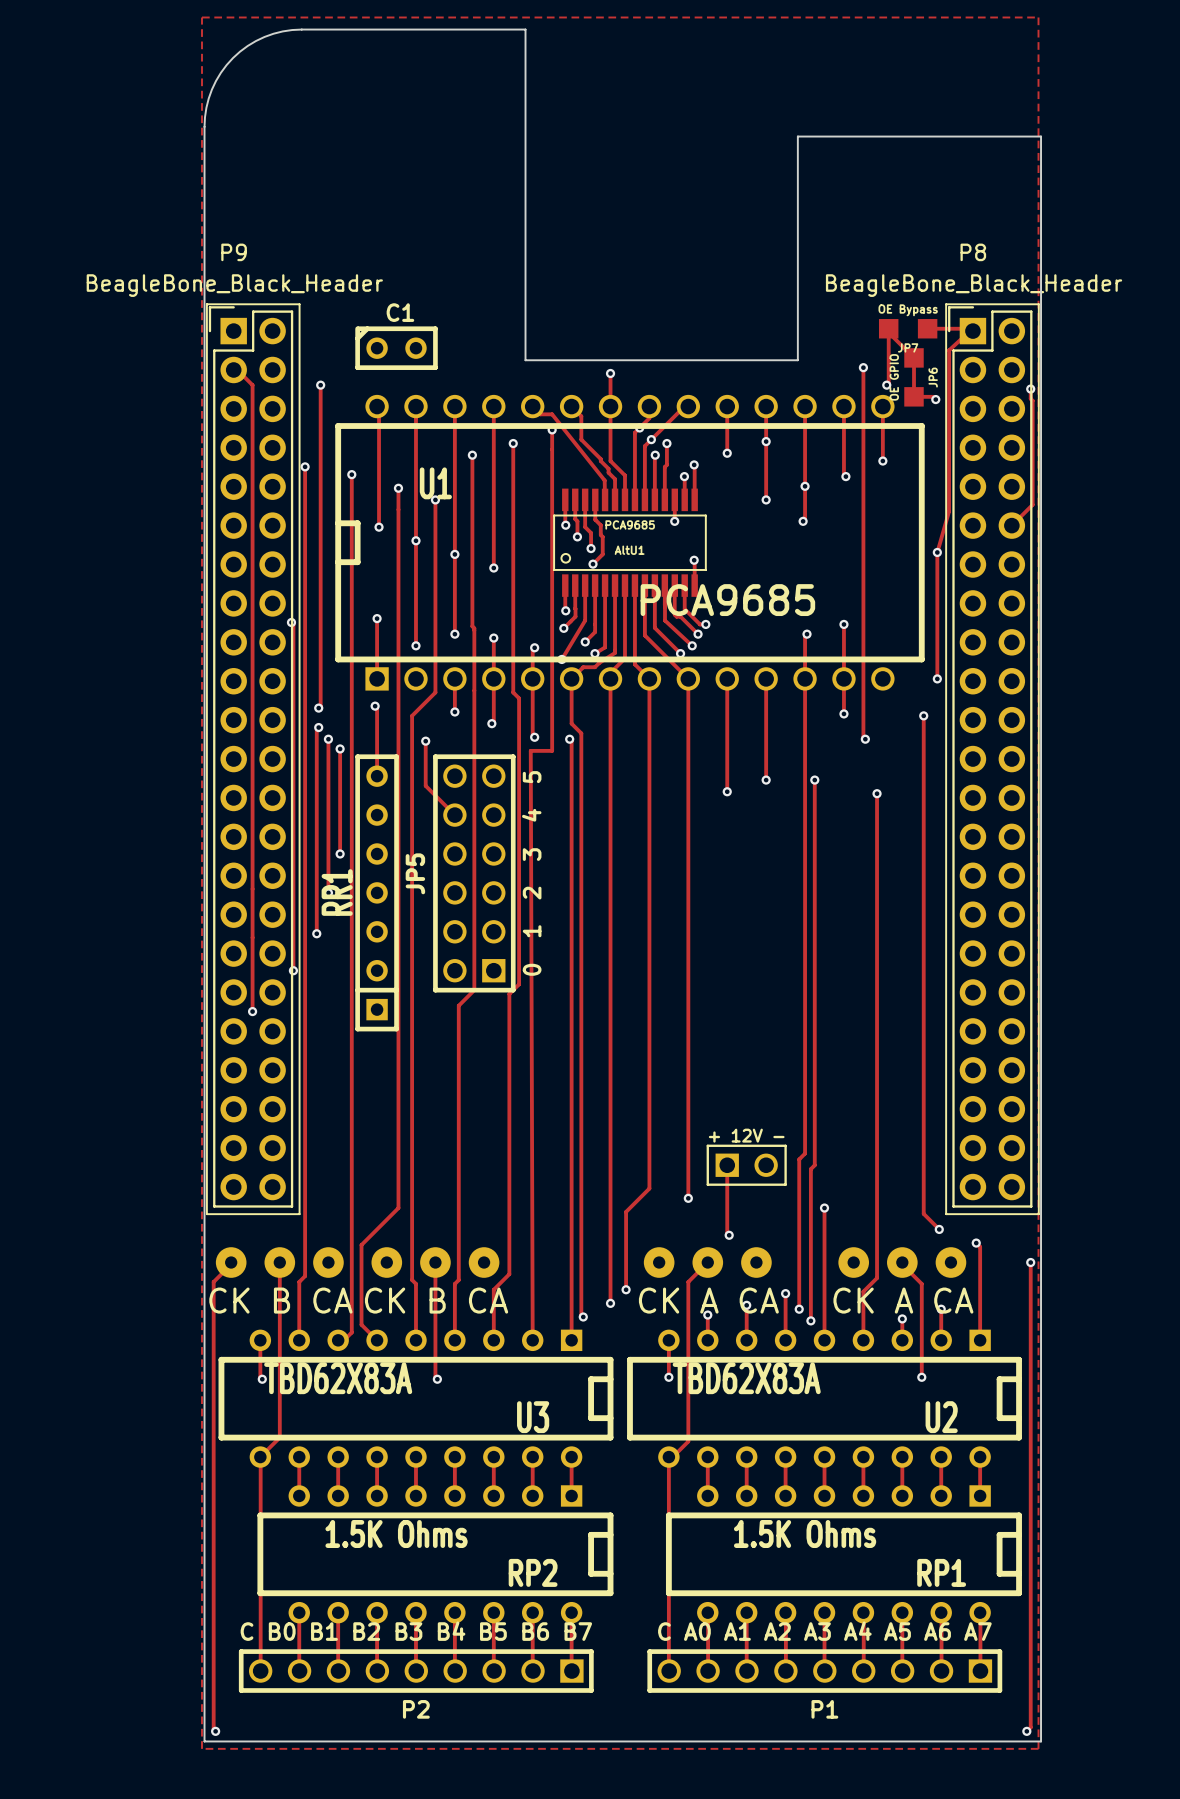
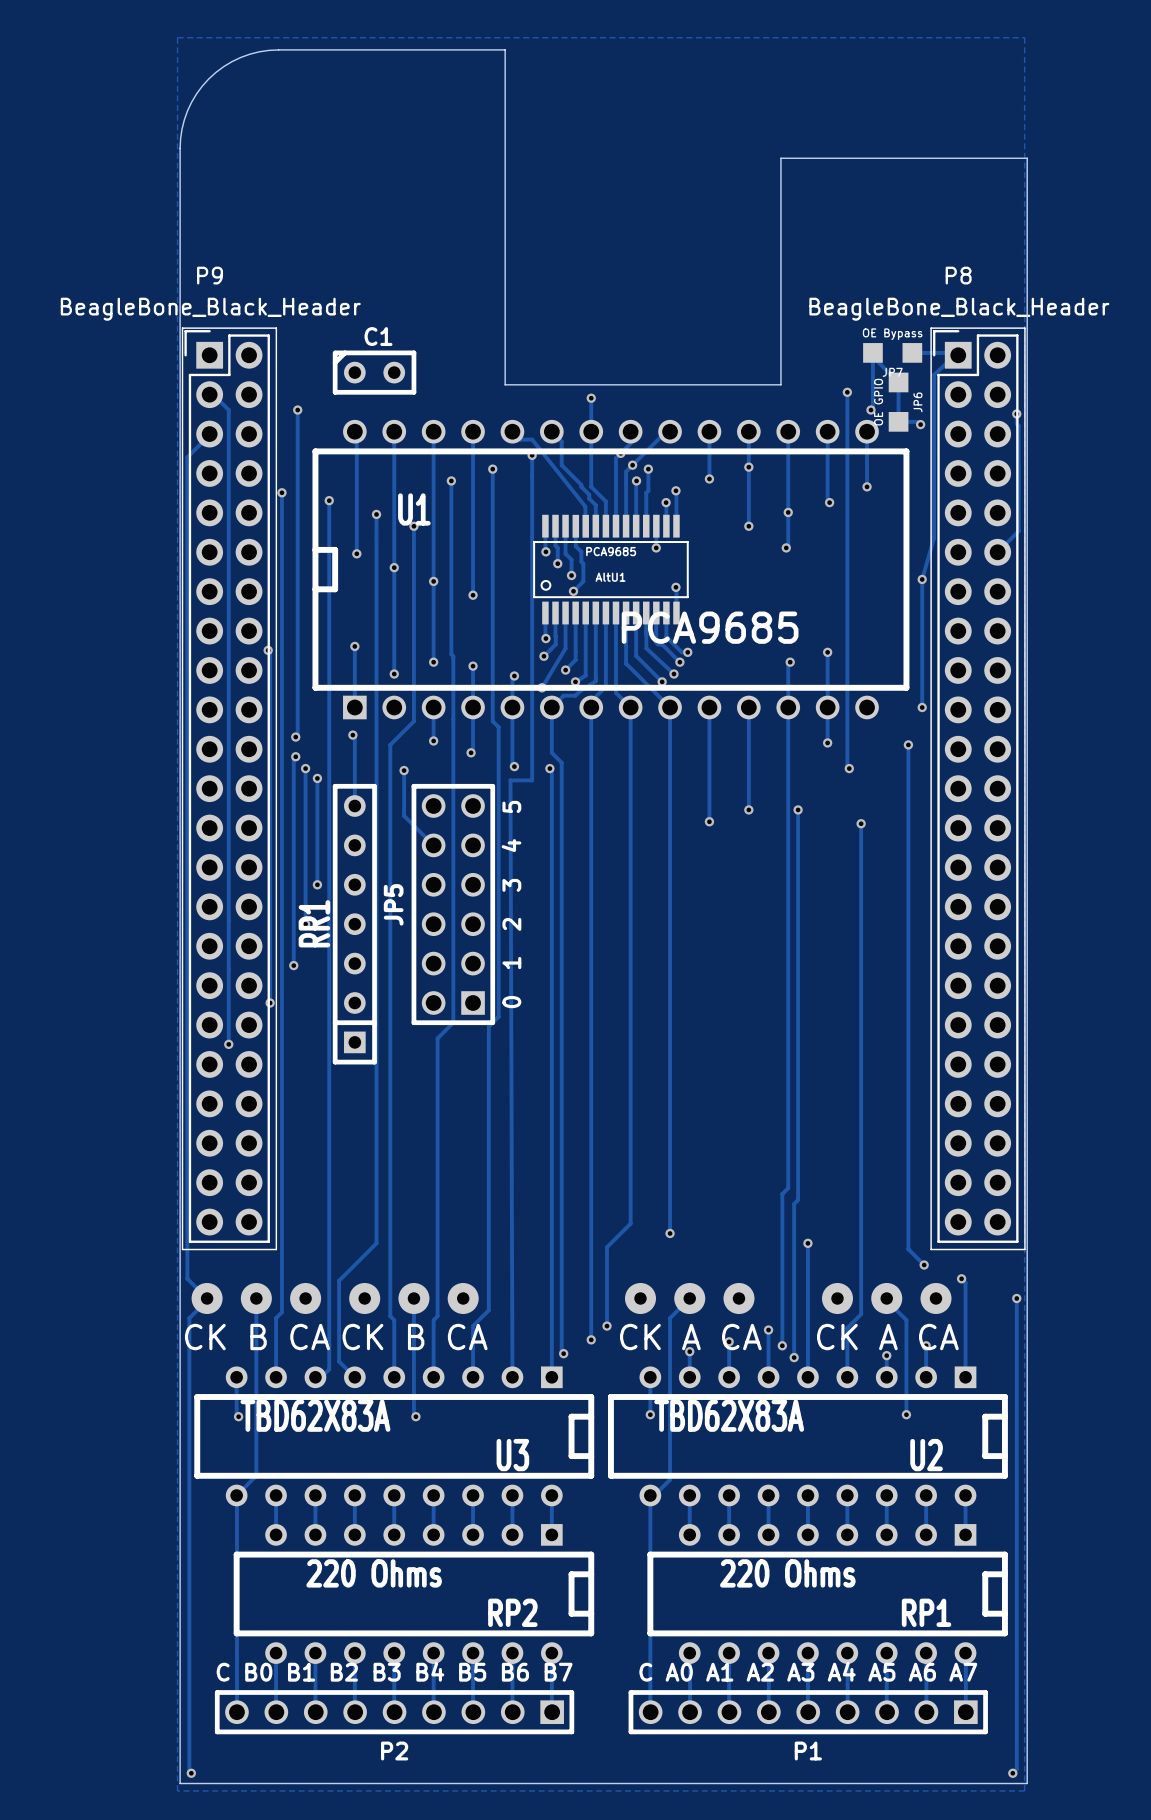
track: none -> (209, 434) (187, 457) (187, 1278) (207, 1298)
track: (727, 1165) (727, 1233) (729, 1235) -> none
part: + 12V - (746, 1165) -> none
via: (729, 1235) -> none
RP2 value: 1.5K Ohms (396, 1533) -> 220 Ohms (374, 1573)
RP1 value: 1.5K Ohms (805, 1533) -> 220 Ohms (787, 1573)

